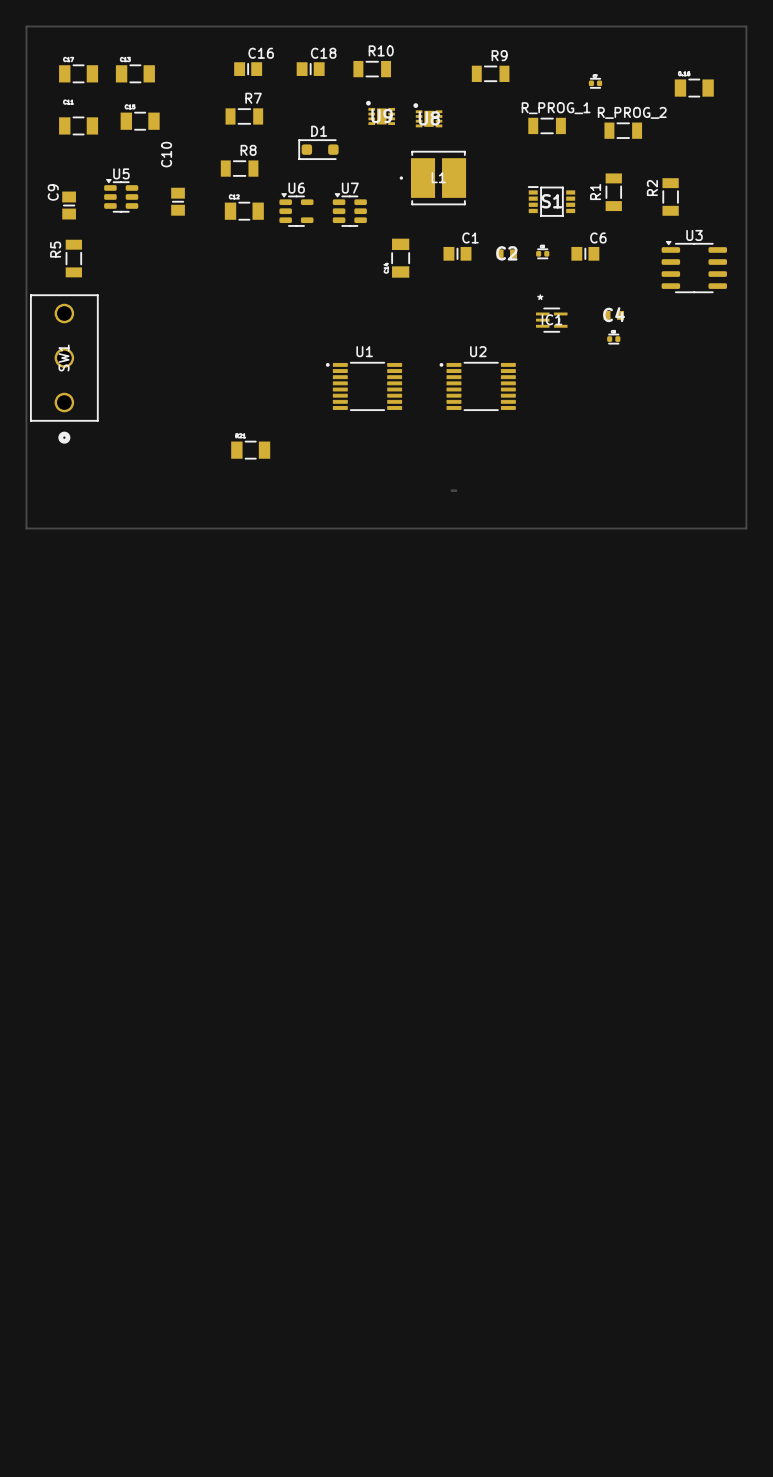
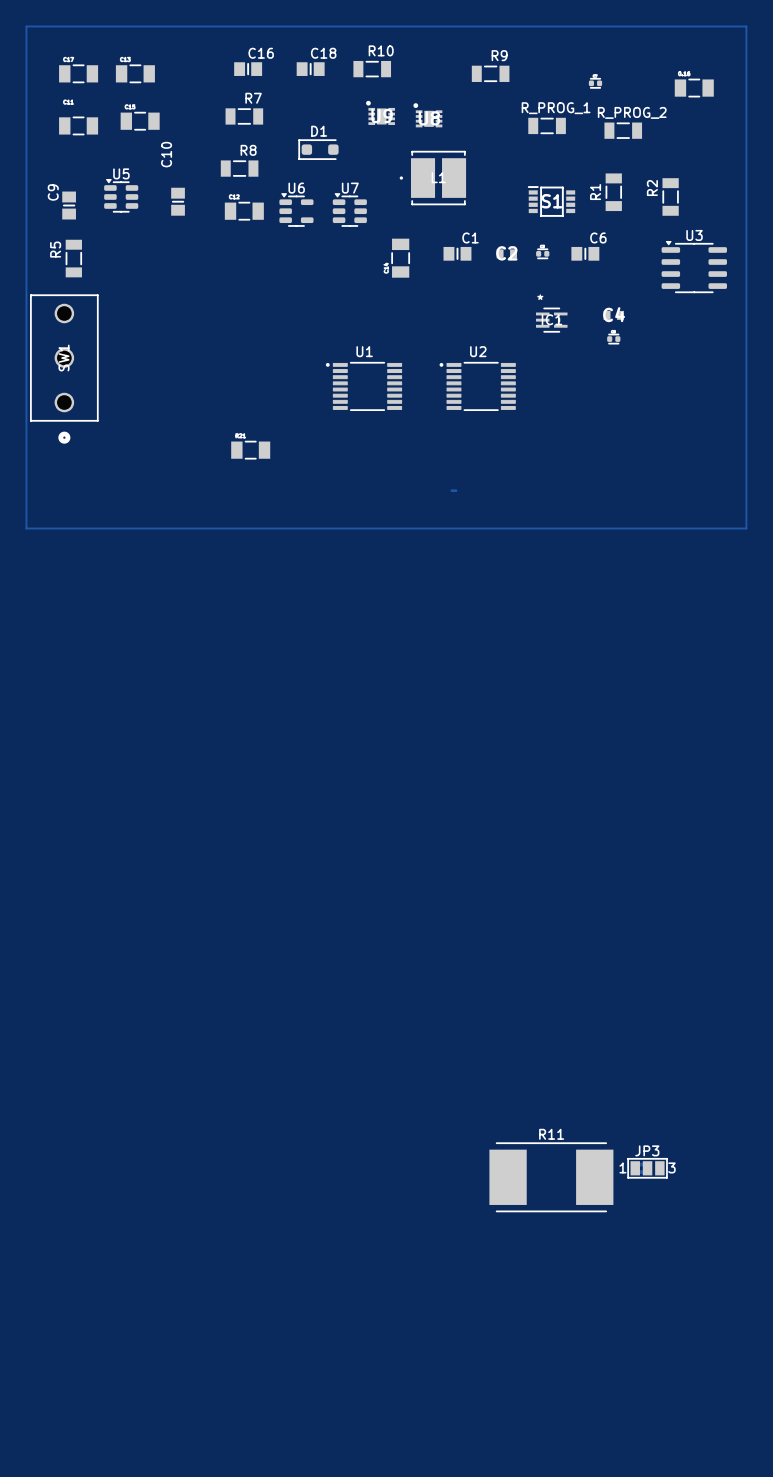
JP3: none -> (647, 1168)
R11: none -> (551, 1177)

